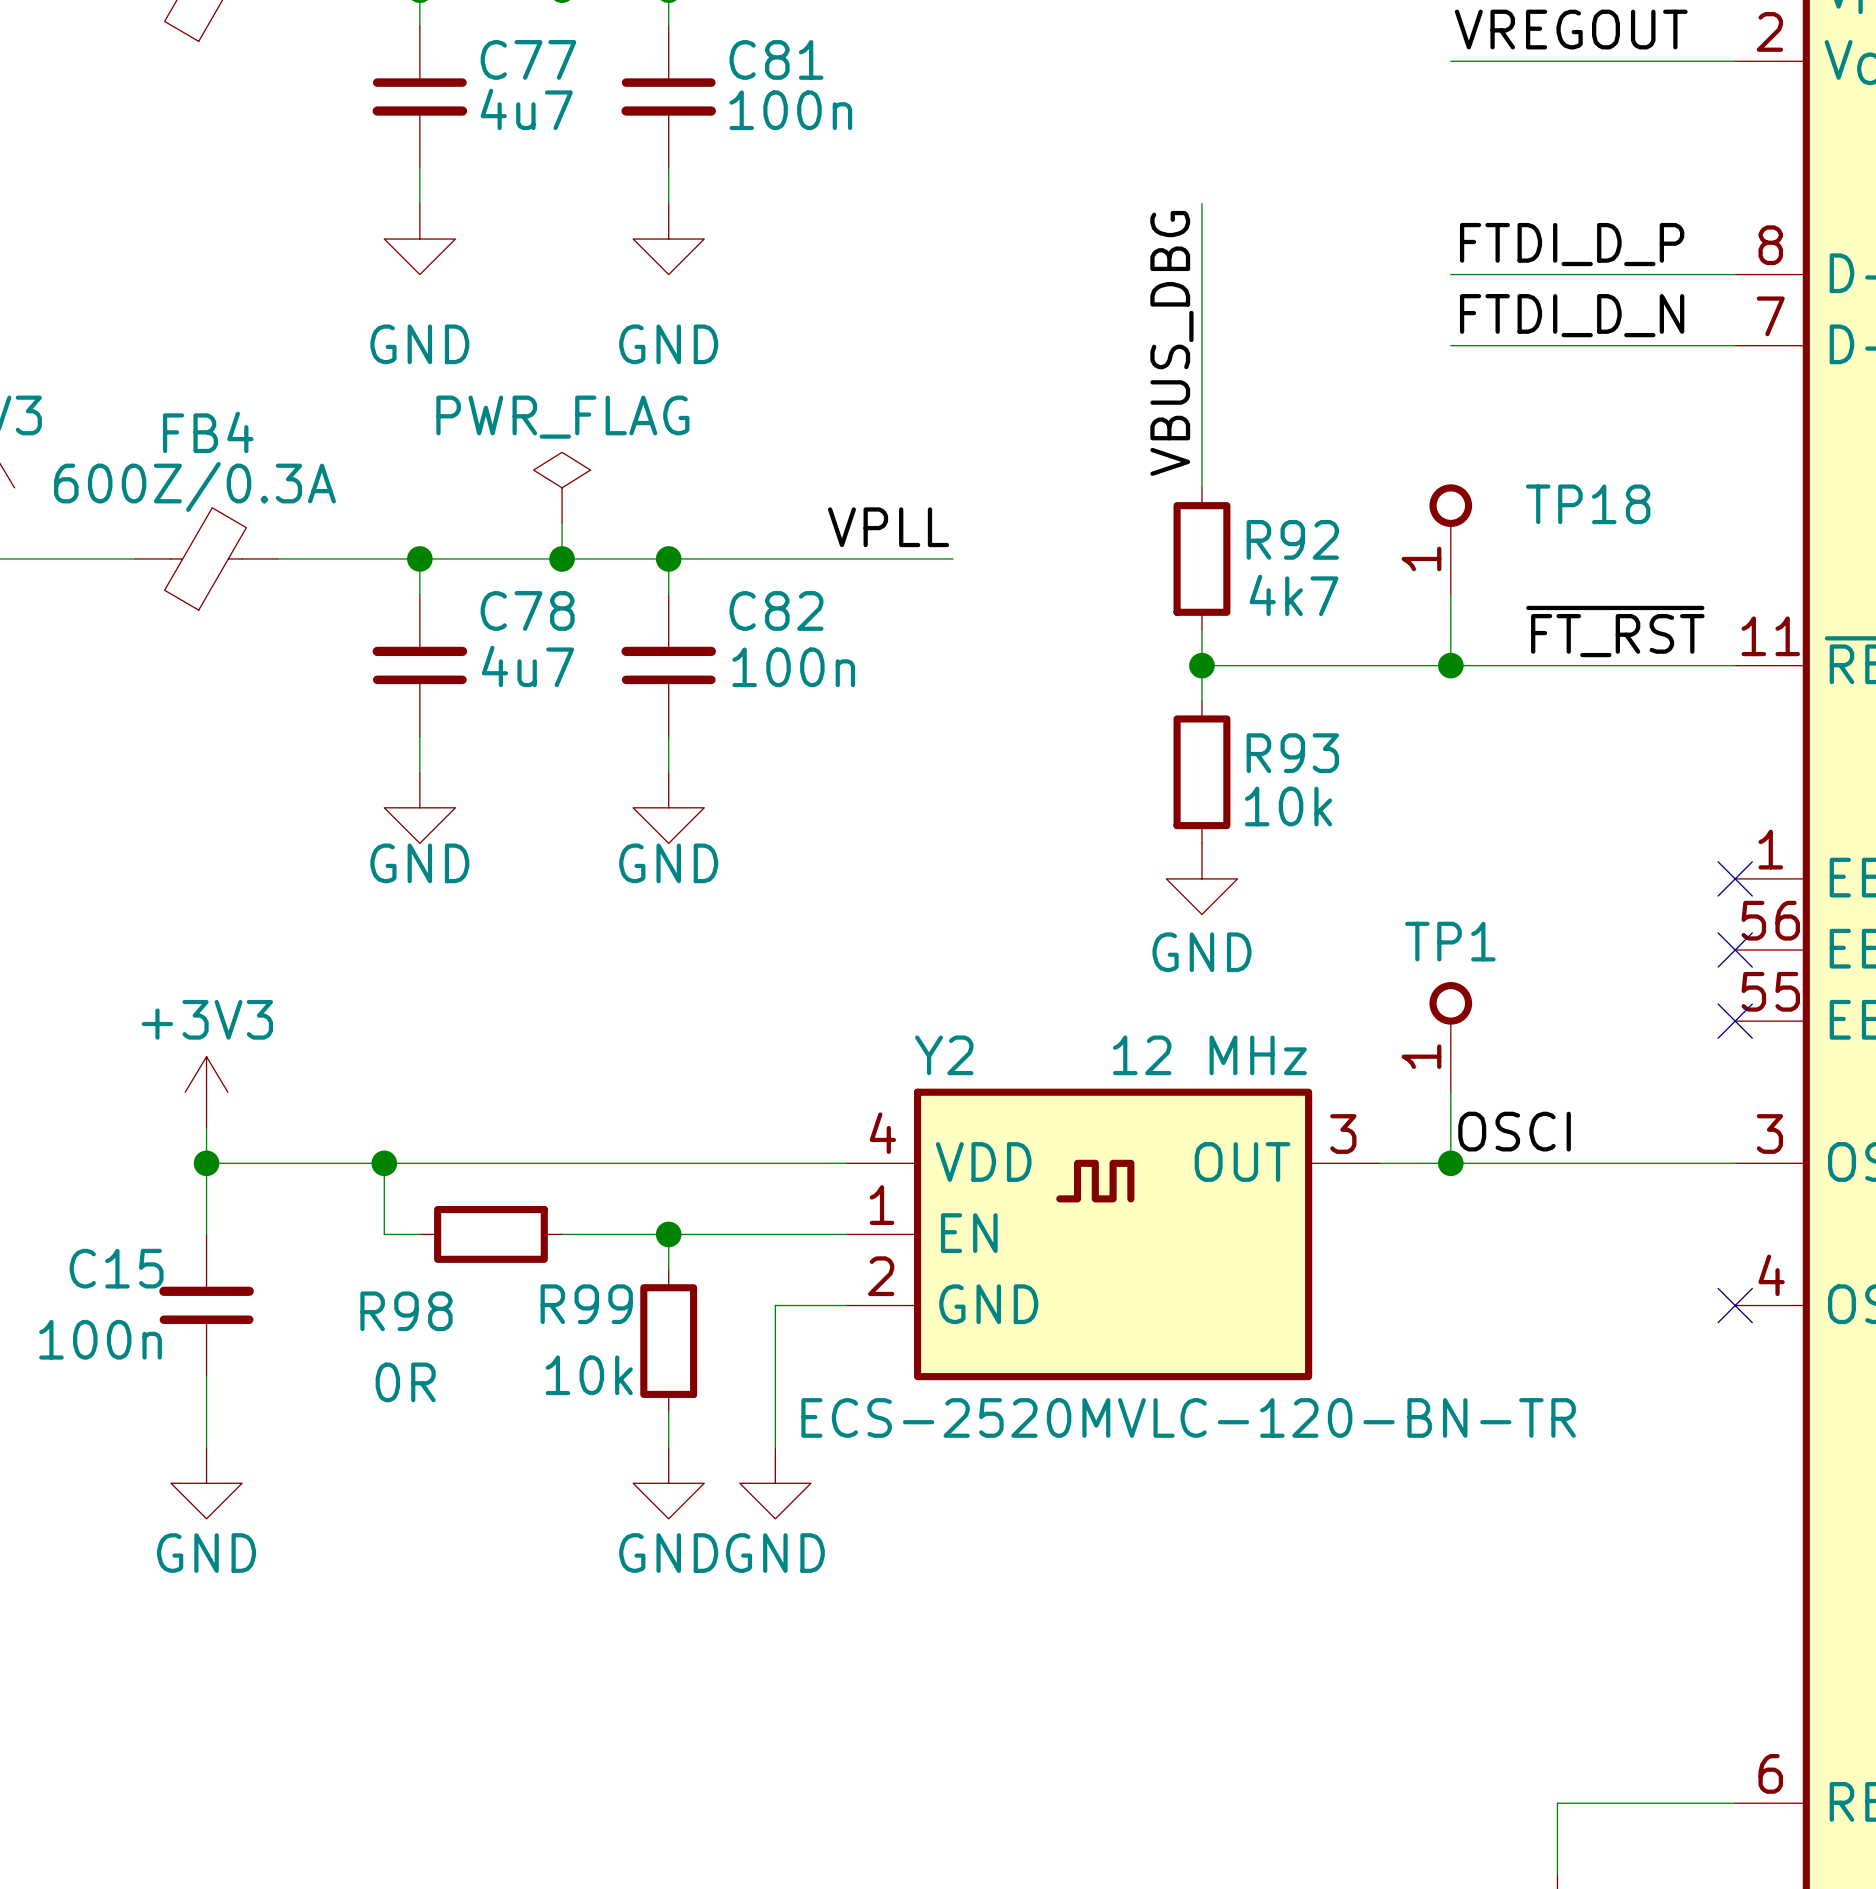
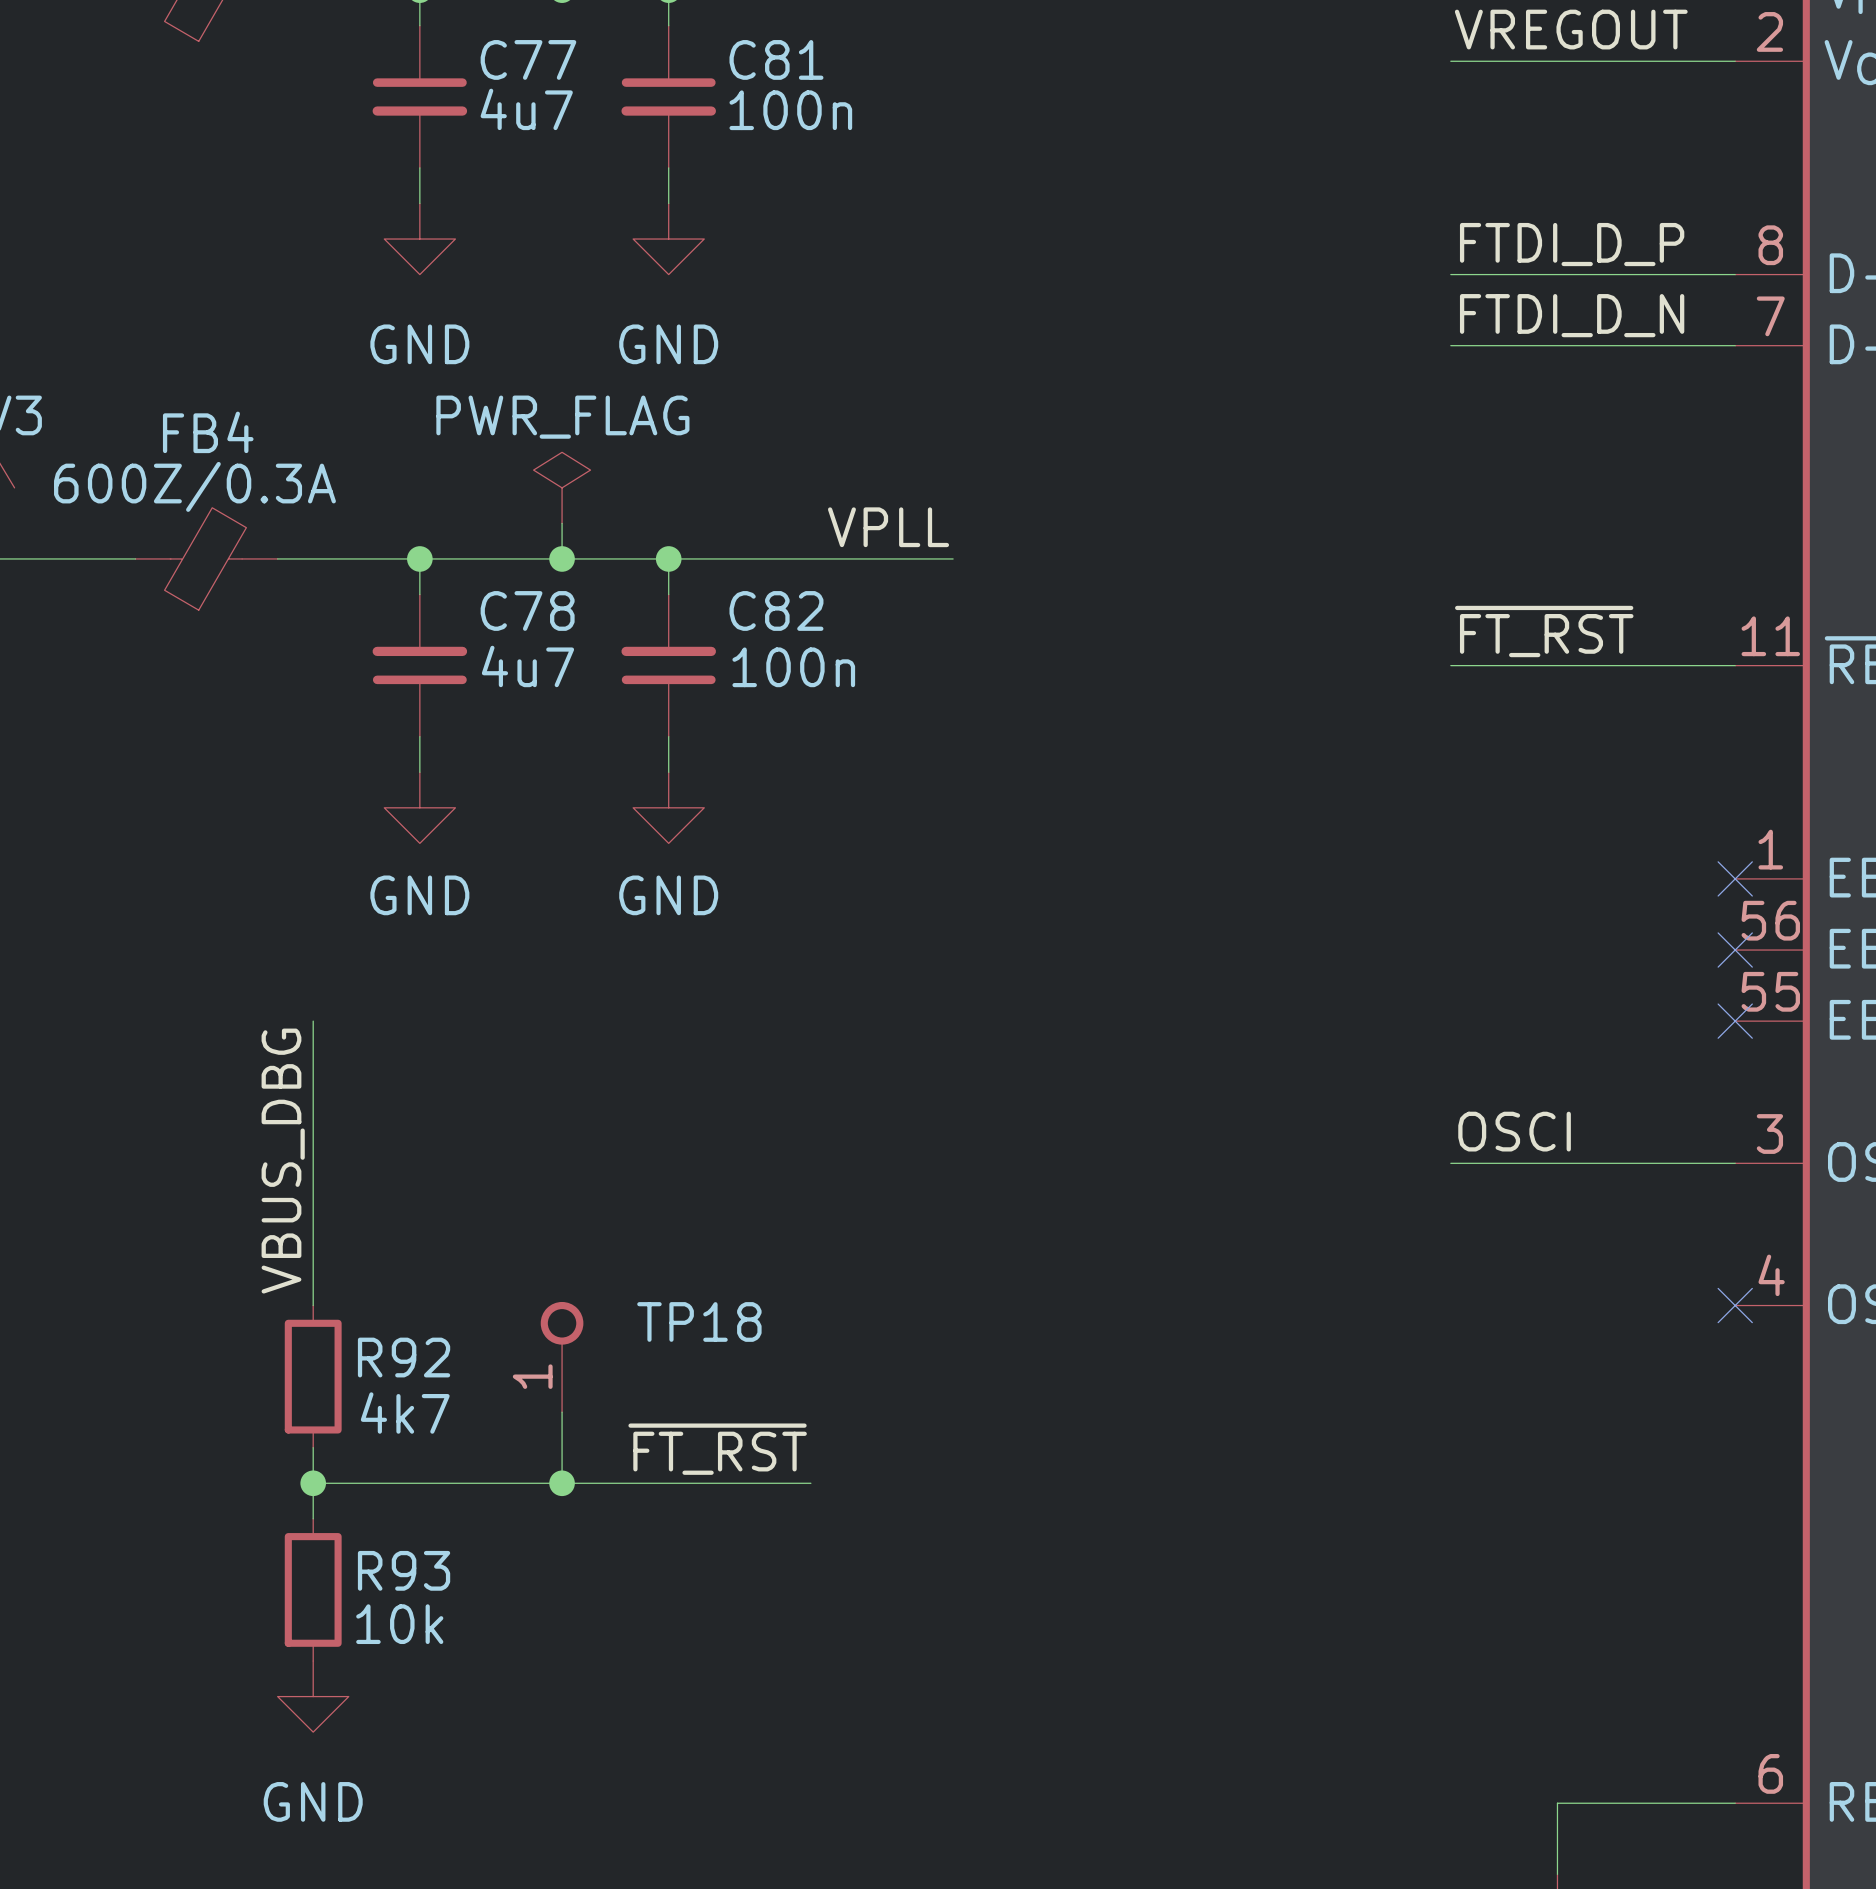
wire: (1201, 203) (1201, 487) -> none
label: VBUS_DBG (1171, 343) -> none
TP18 position: (1450, 539) -> (562, 1357)
R92 position: (1201, 558) -> (313, 1376)
wire: (1450, 594) (1450, 665) (1201, 665) -> none
wire: (1201, 630) (1201, 701) -> none
label position: ~{FT_RST} (1615, 631) -> ~{FT_RST} (1544, 631)
junction: (1201, 665) -> none
junction: (1450, 665) -> none
R93 position: (1201, 772) -> (313, 1589)
power symbol text position: GND (419, 863) -> GND (419, 895)
power symbol text position: GND (668, 863) -> GND (668, 895)
power symbol: GND (1201, 878) -> none
wire: none -> (313, 1021) (313, 1305)
TP1: (1450, 1037) -> none
power symbol: +3V3 (206, 1092) -> none
wire: (1450, 1092) (1450, 1163) (1379, 1163) -> none
wire: (206, 1127) (206, 1234) -> none
label: none -> VBUS_DBG (283, 1161)
wire: (206, 1163) (846, 1163) -> none
junction: (206, 1163) -> none
wire: (384, 1163) (384, 1234) (419, 1234) -> none
junction: (384, 1163) -> none
junction: (1450, 1163) -> none
R98: (490, 1234) -> none
wire: (562, 1234) (846, 1234) -> none
wire: (668, 1234) (668, 1269) -> none
junction: (668, 1234) -> none
Y2: (1113, 1234) -> none
C15: (206, 1305) -> none
wire: (846, 1305) (775, 1305) (775, 1447) -> none
R99: (668, 1341) -> none
wire: (206, 1376) (206, 1447) -> (313, 1447) (313, 1518)
wire: none -> (562, 1412) (562, 1483)
wire: (668, 1412) (668, 1447) -> none
label: none -> ~{FT_RST} (717, 1449)
power symbol: GND (206, 1483) -> none
wire: none -> (313, 1483) (810, 1483)
junction: none -> (313, 1483)
junction: none -> (562, 1483)
power symbol: GND (668, 1483) -> none
power symbol: GND (775, 1483) -> none
power symbol: none -> GND (313, 1696)

